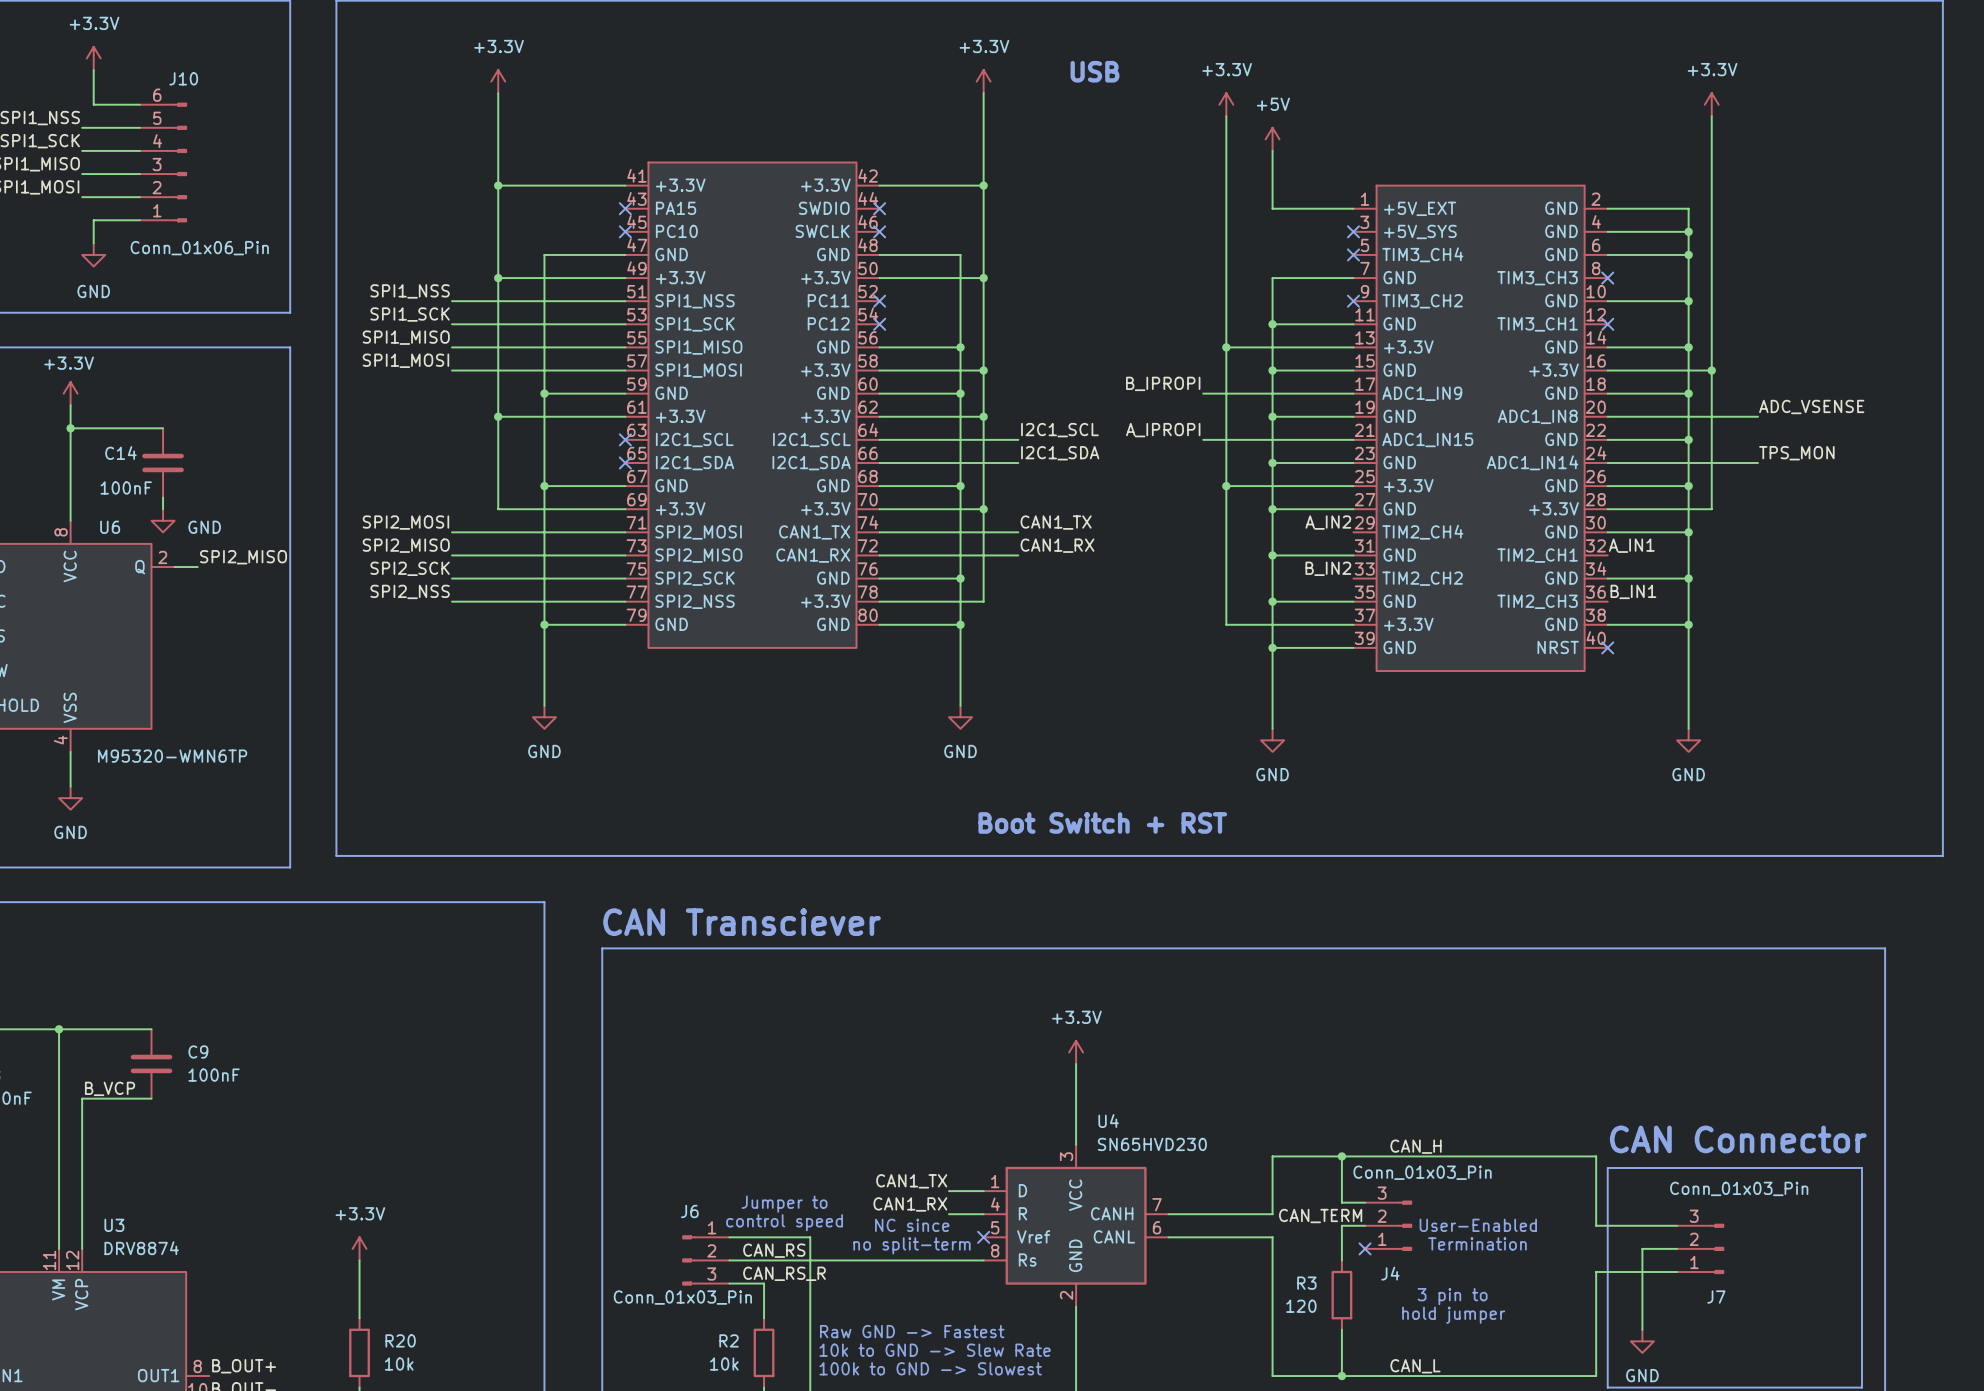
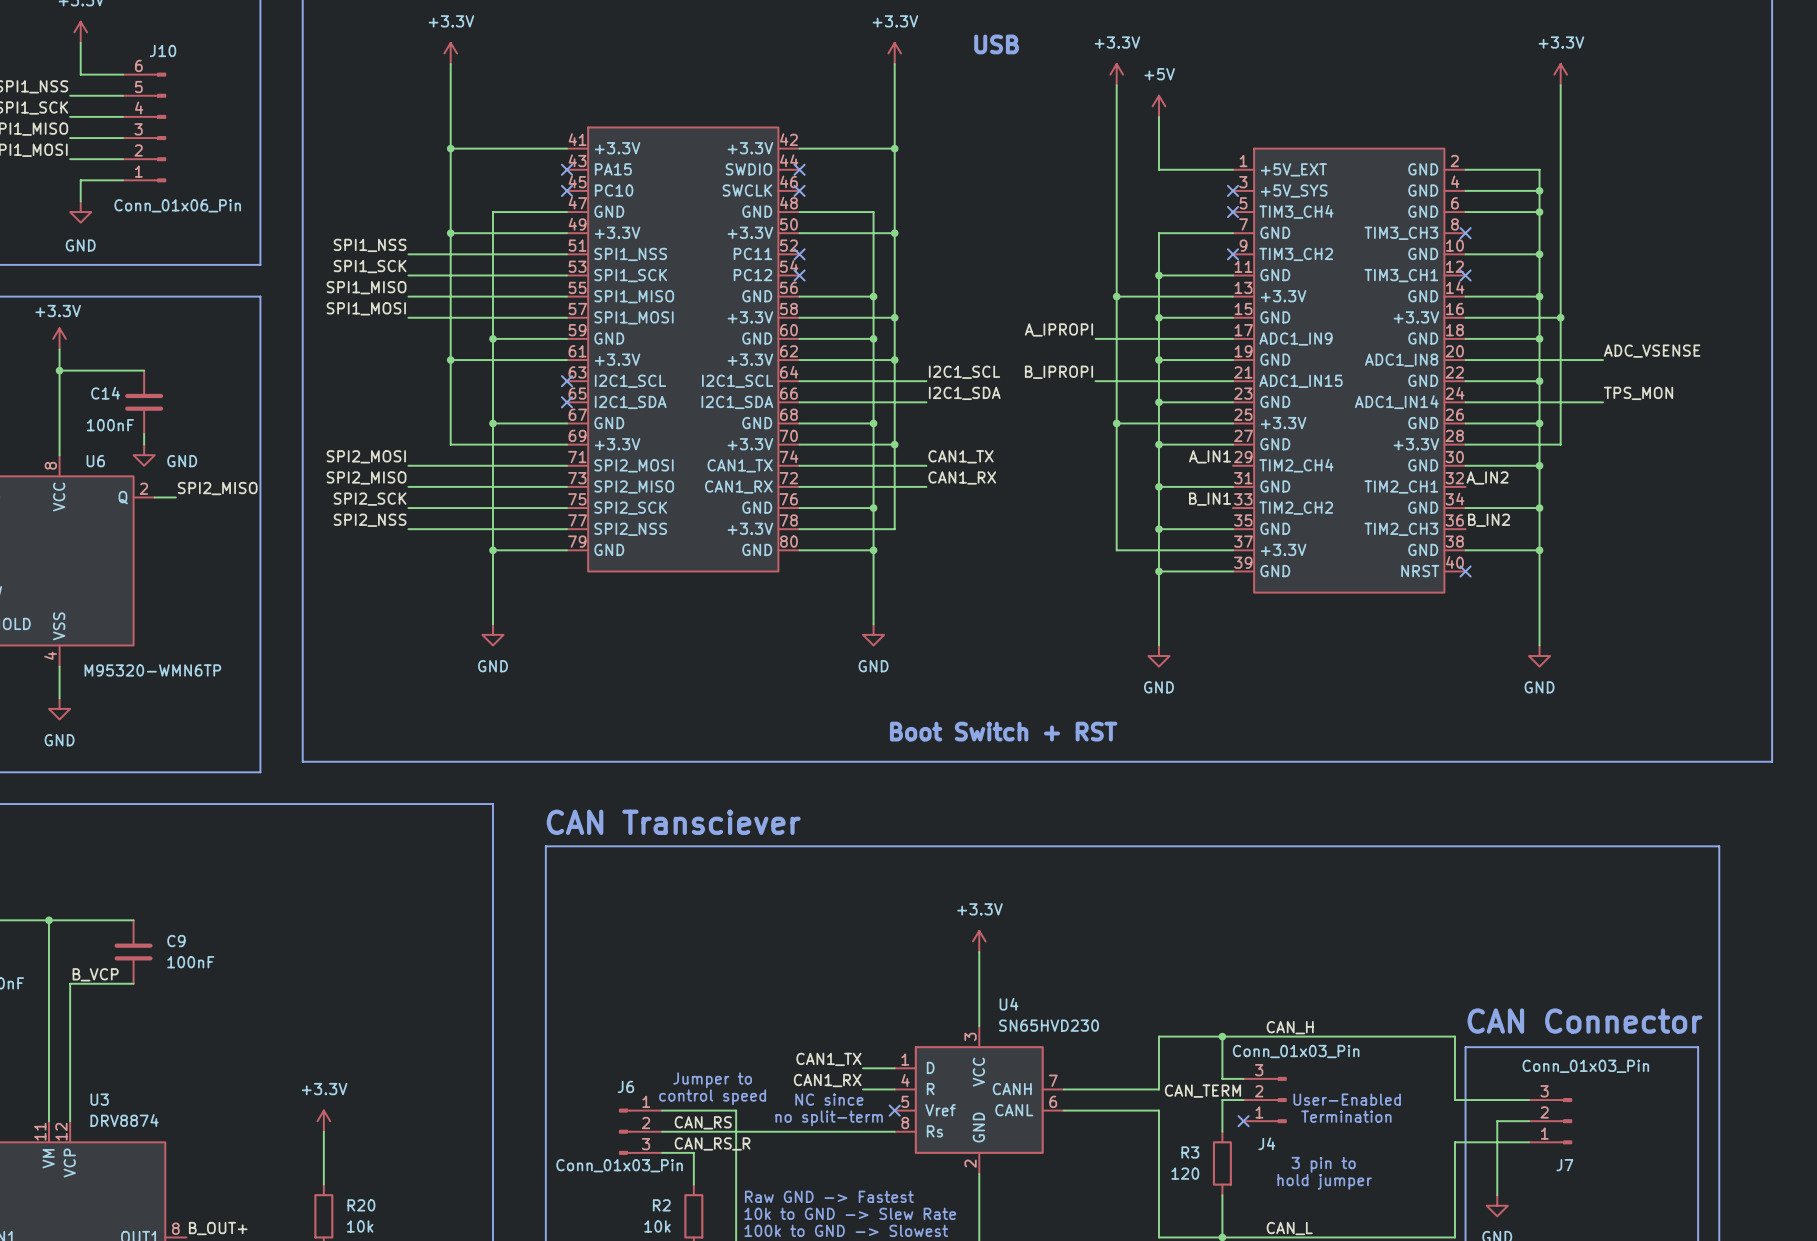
label: B_IPROPI (1163, 383) -> A_IPROPI (1058, 329)
label: A_IPROPI (1163, 430) -> B_IPROPI (1058, 372)
label: A_IN2 (1328, 522) -> A_IN1 (1210, 456)
label: A_IN1 (1631, 545) -> A_IN2 (1487, 477)
label: B_IN2 (1328, 568) -> B_IN1 (1210, 499)
label: B_IN1 (1633, 591) -> B_IN2 (1489, 520)

